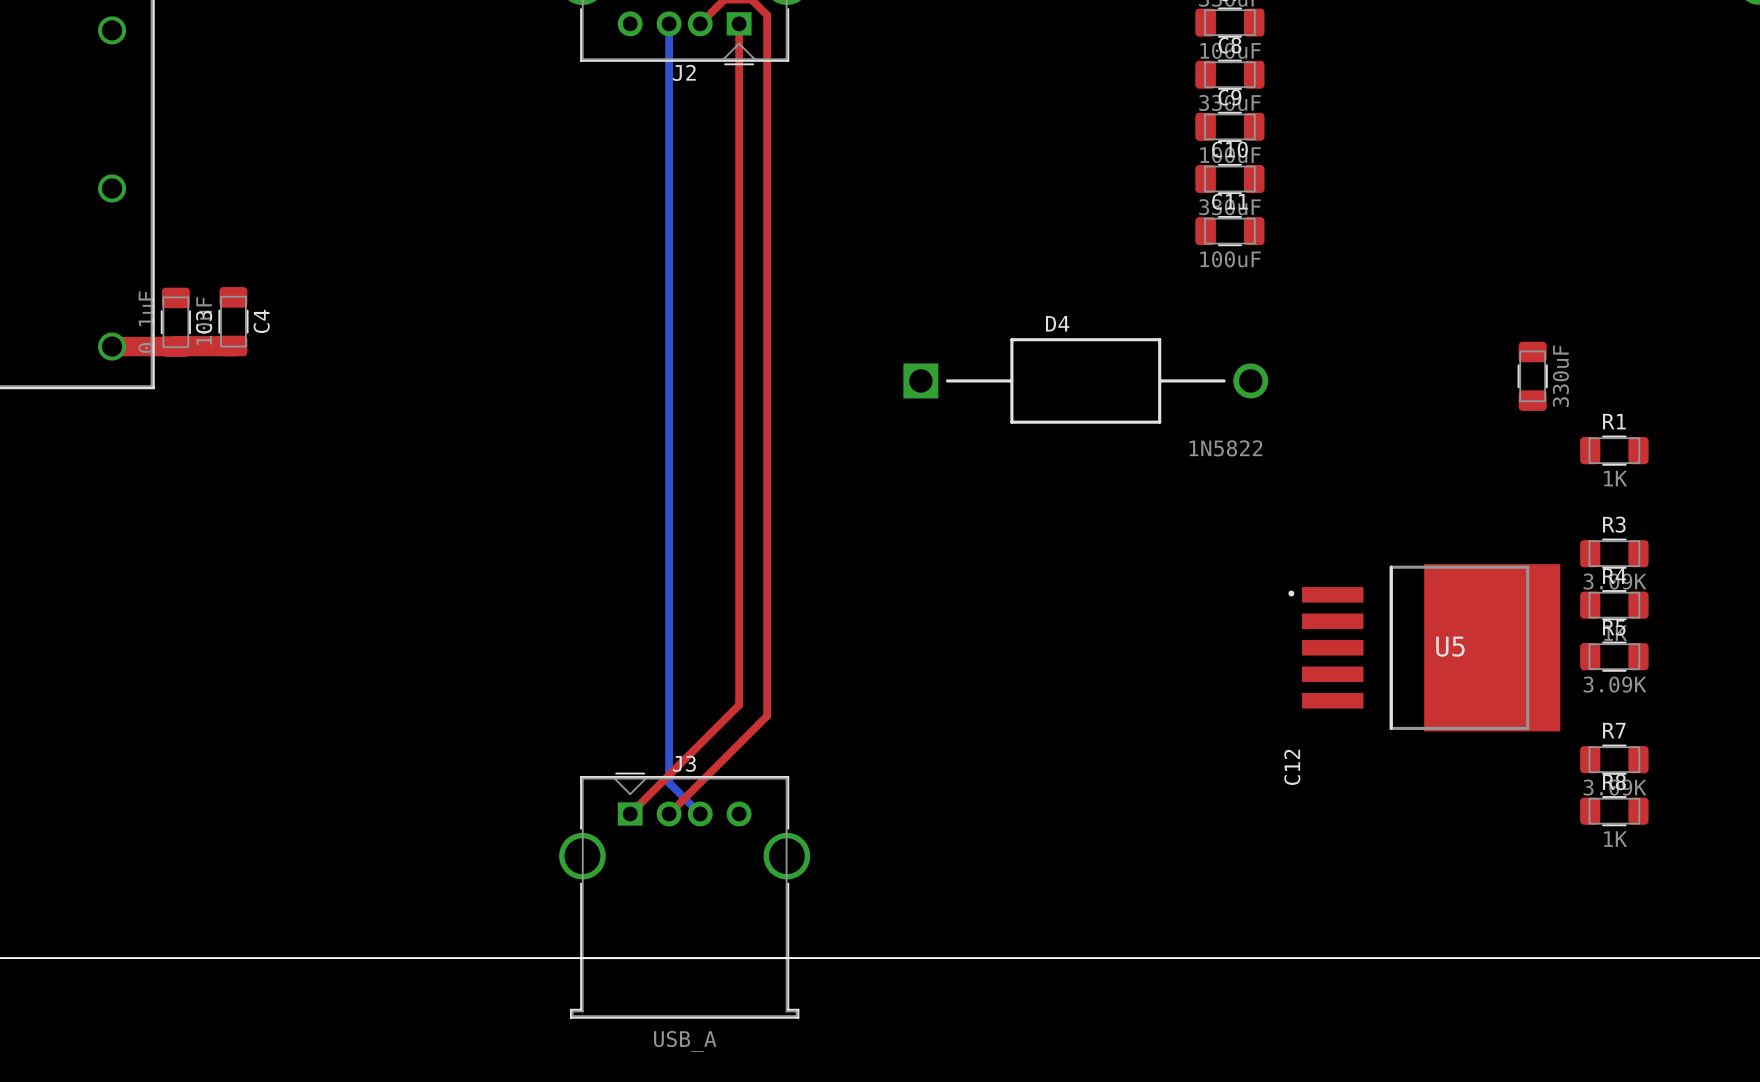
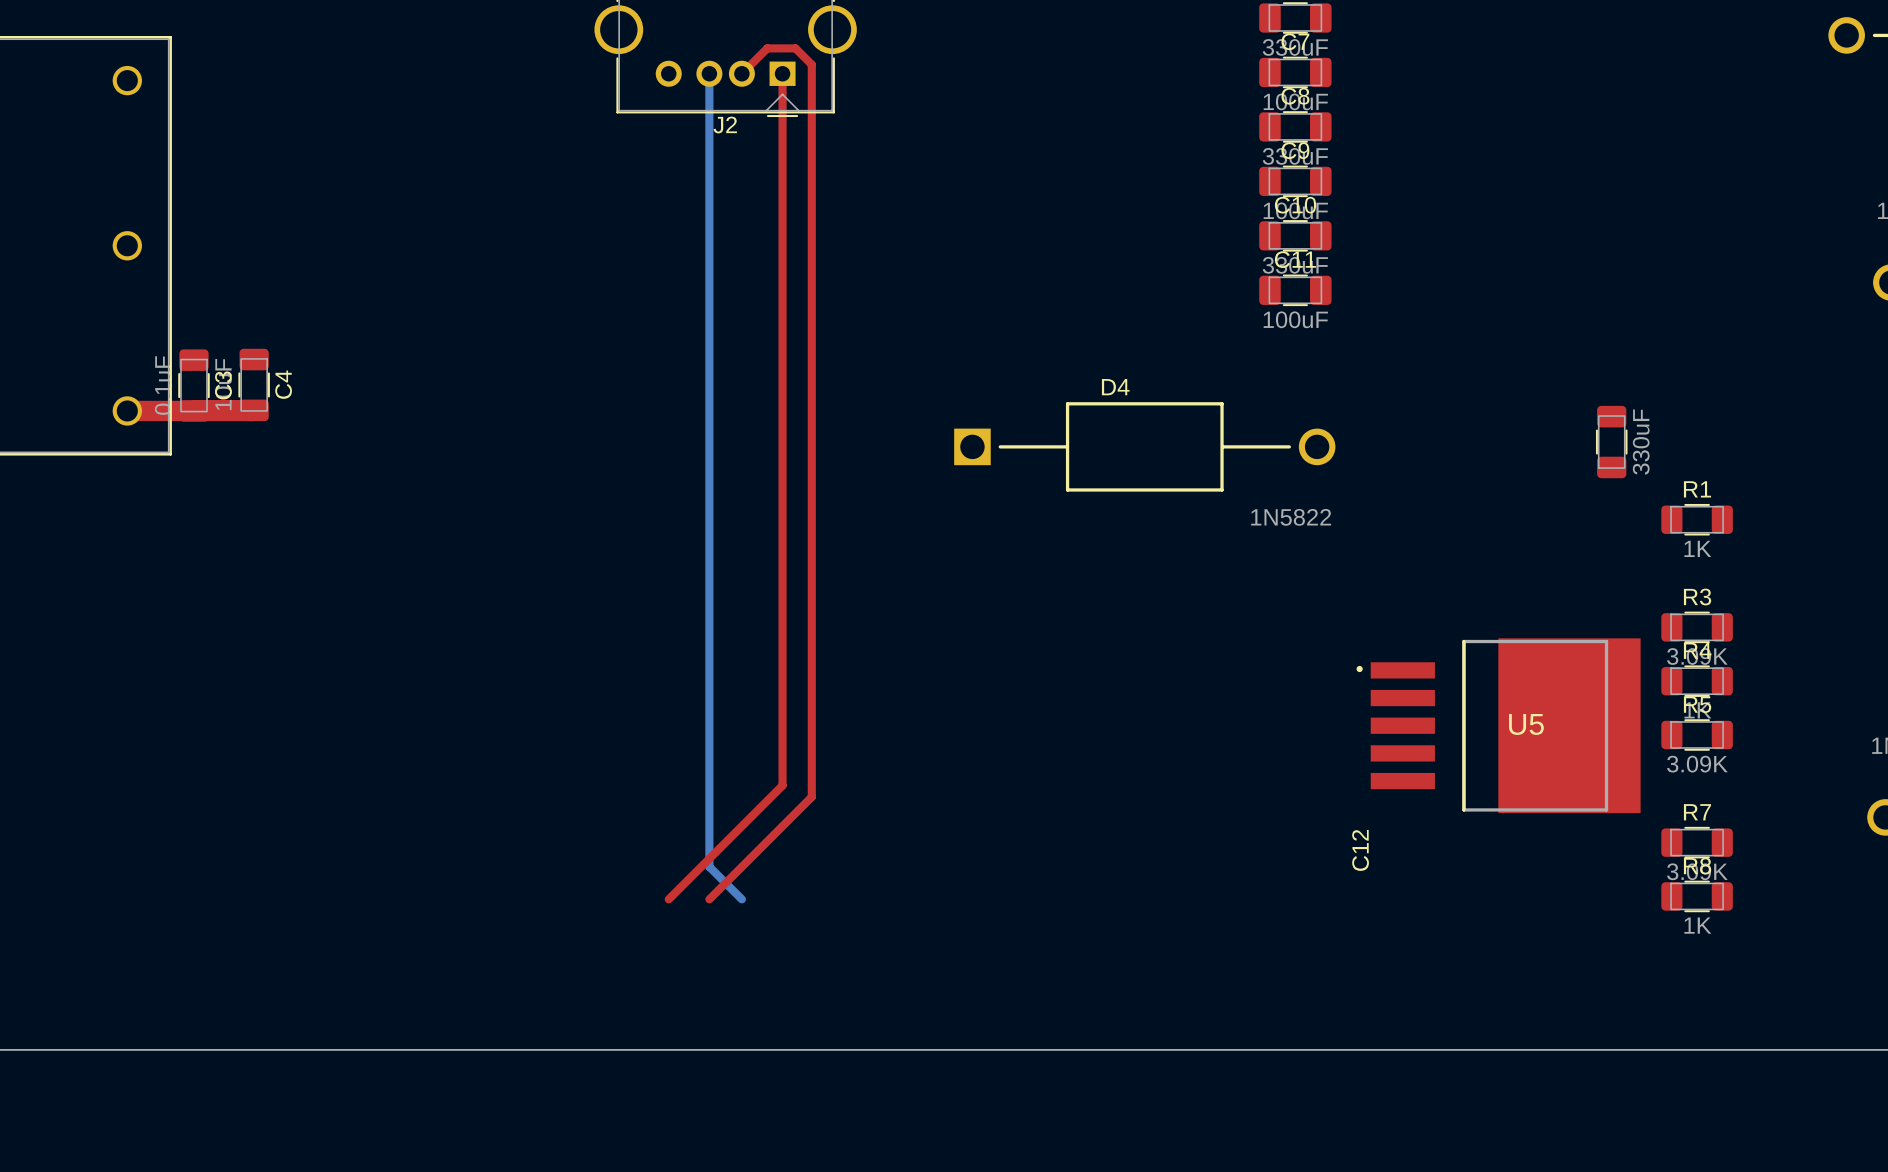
J3: USB_A (684, 895) -> none

